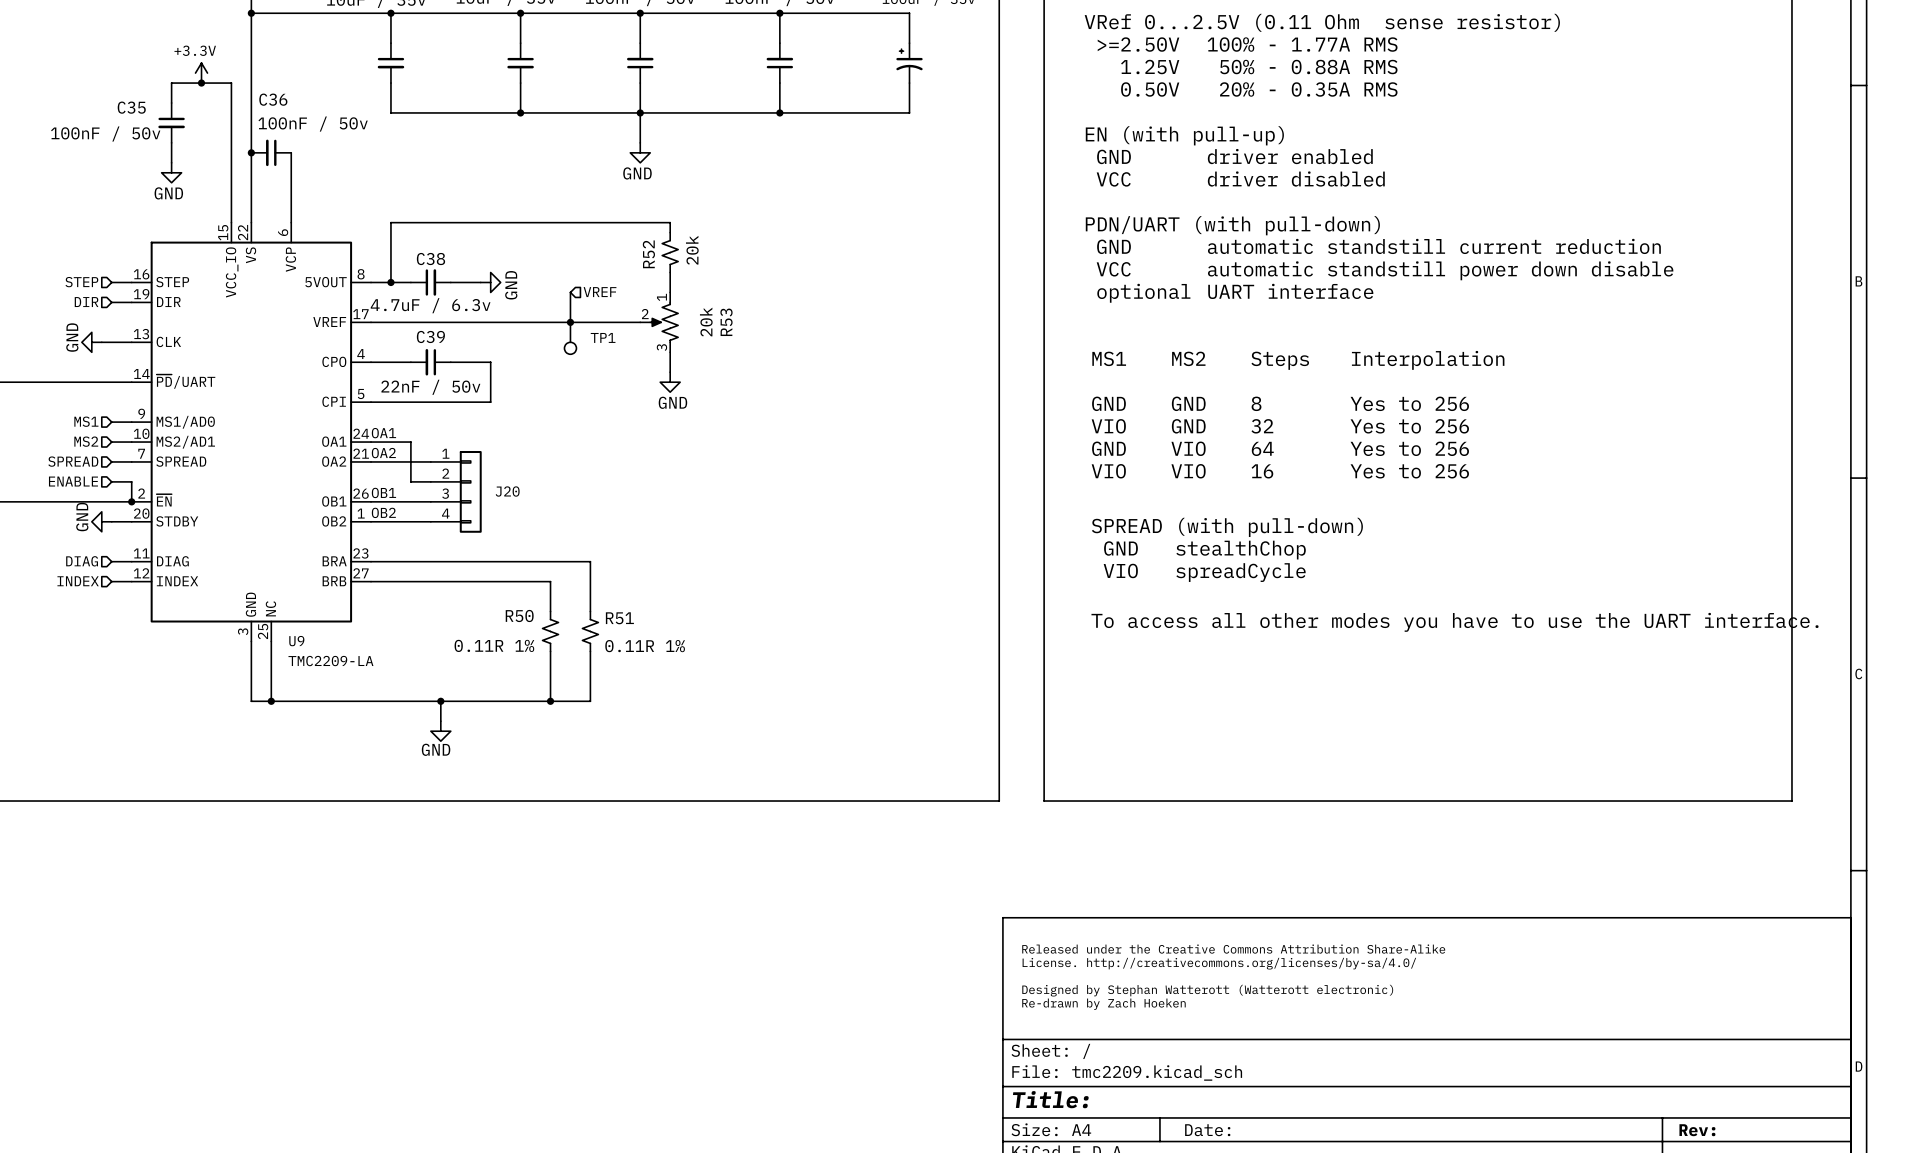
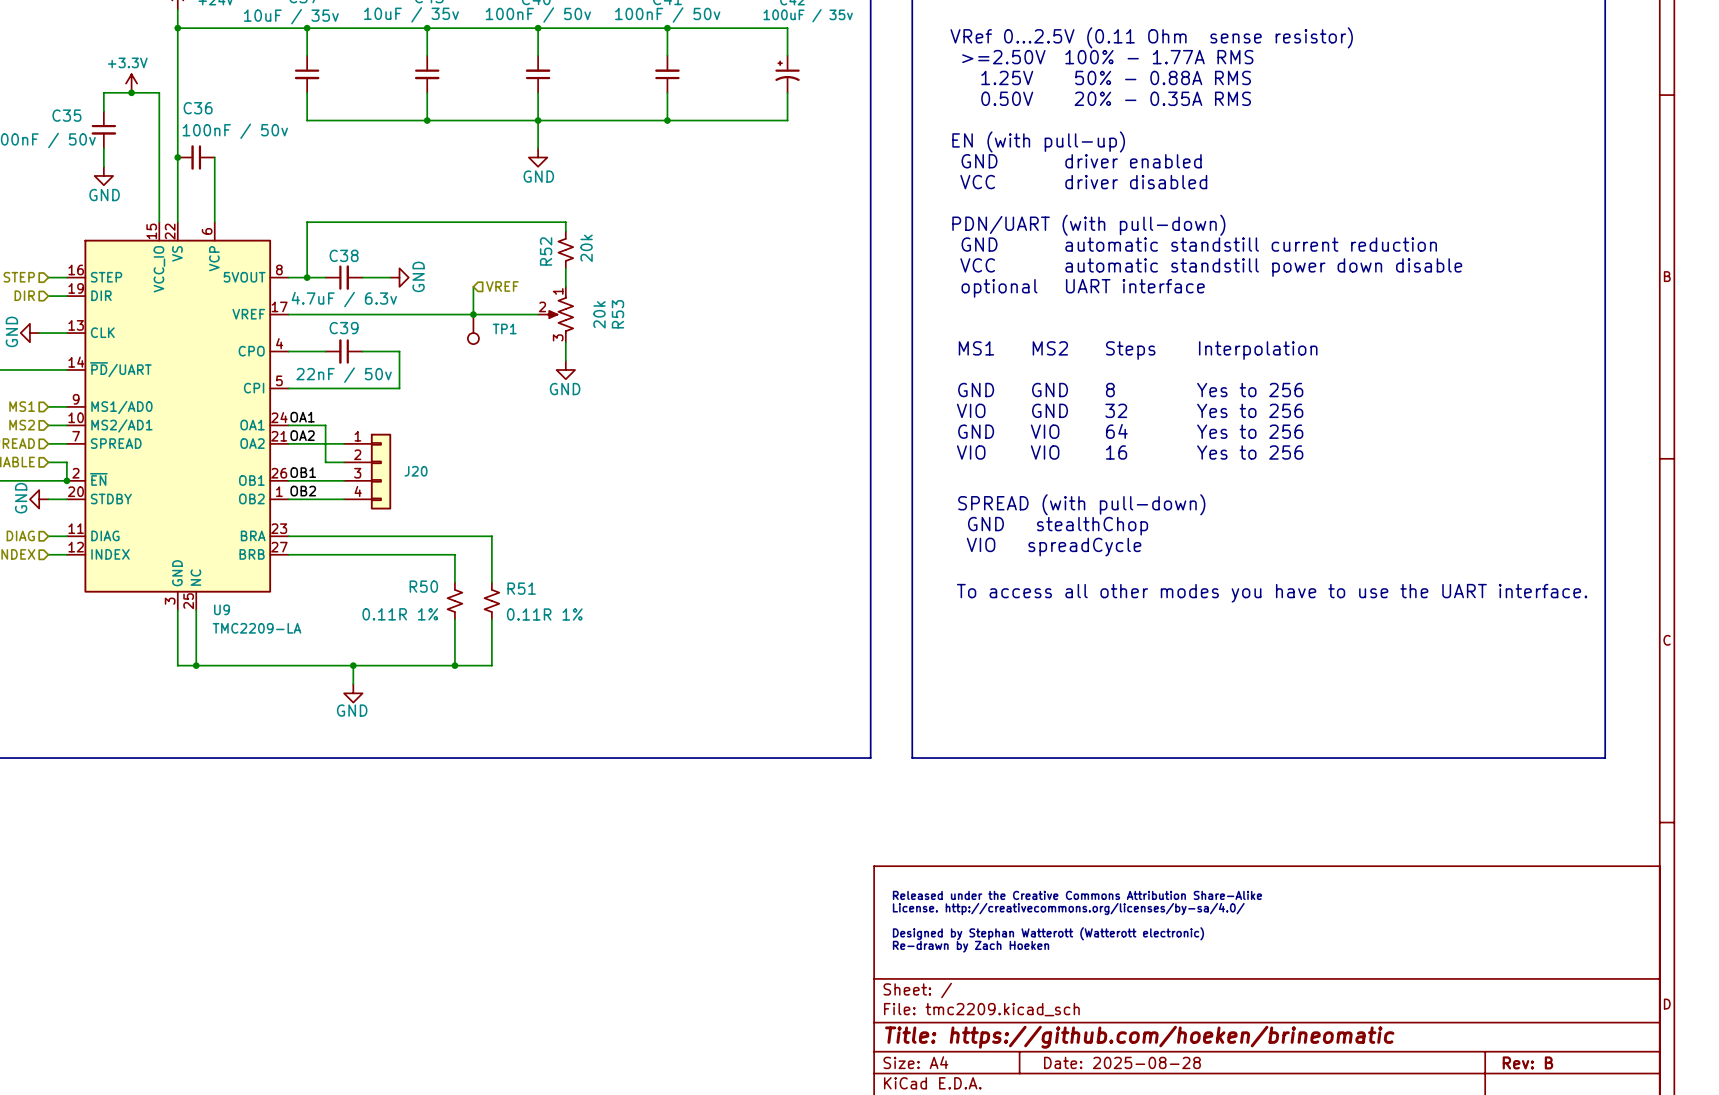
title block: Title: (1050, 1099) -> Title: https://github.com/hoeken/brineomatic (1139, 1037)
title block: Date: (1207, 1130) -> Date: 2025-08-28 (1122, 1062)
title block: Rev: (1697, 1130) -> Rev: B (1527, 1062)

